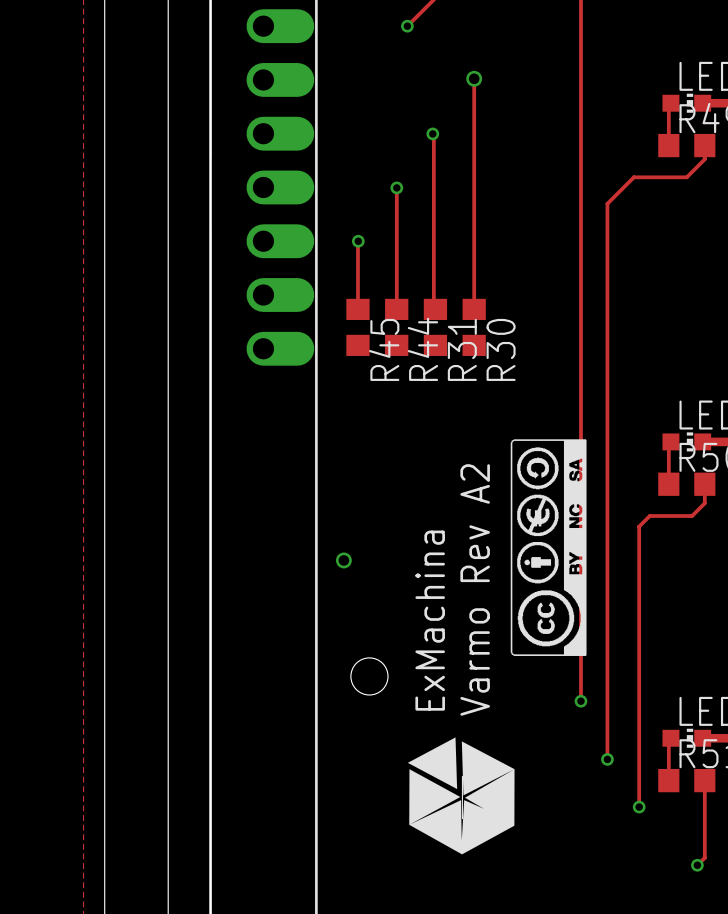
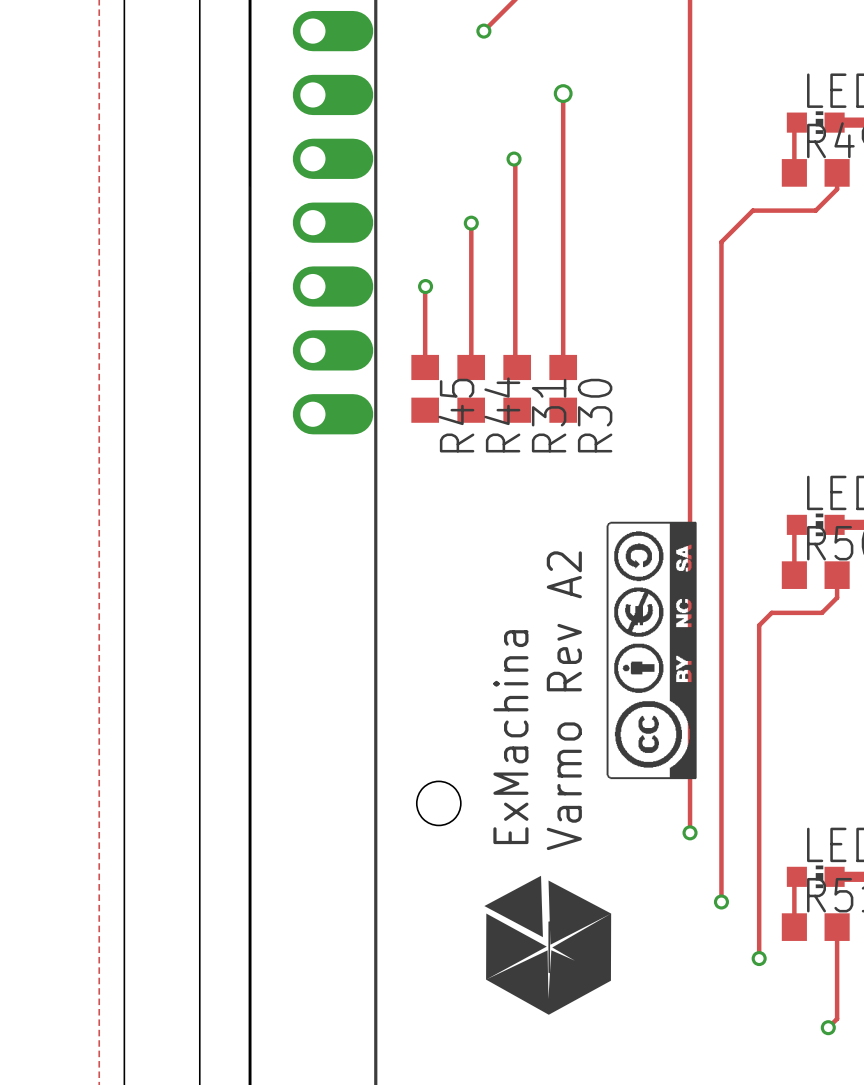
via: (343, 560) -> none

